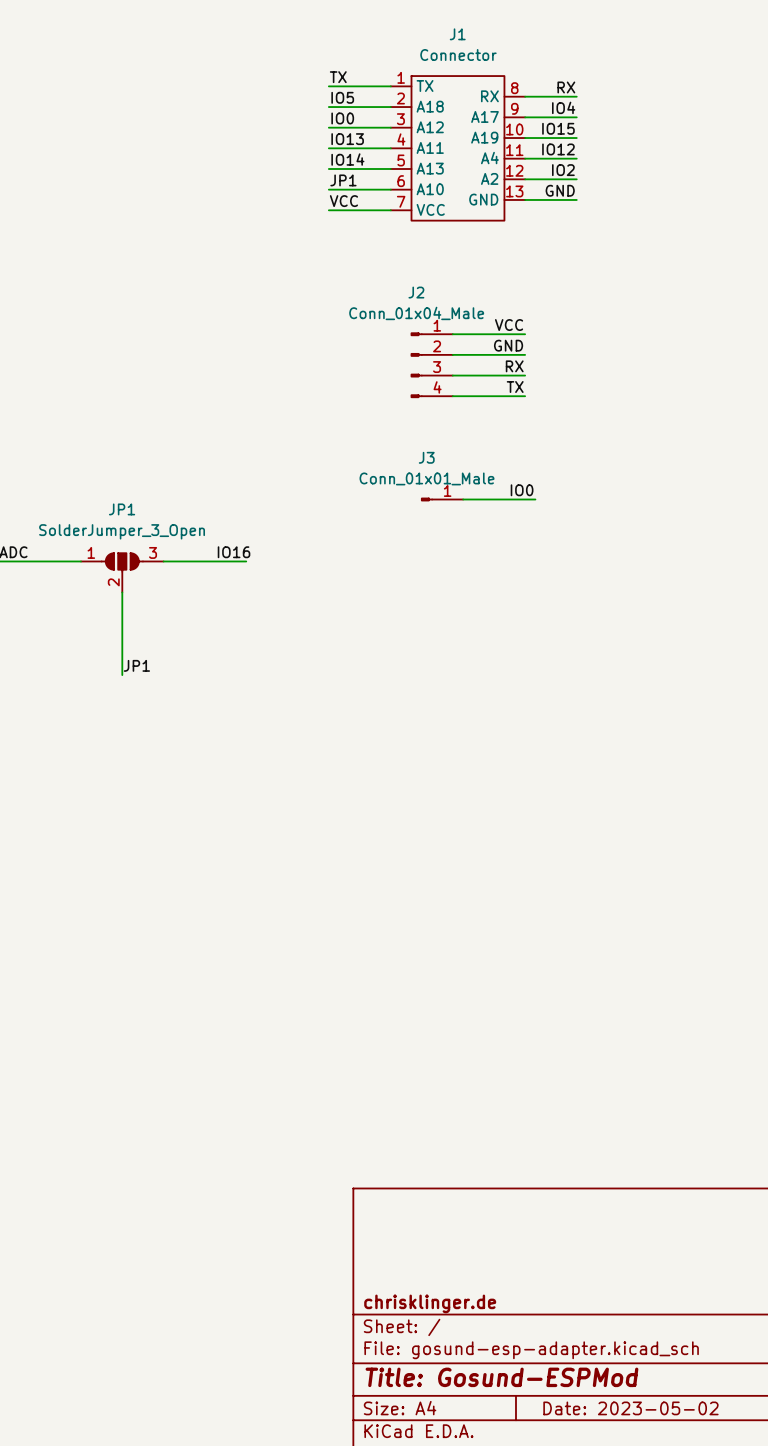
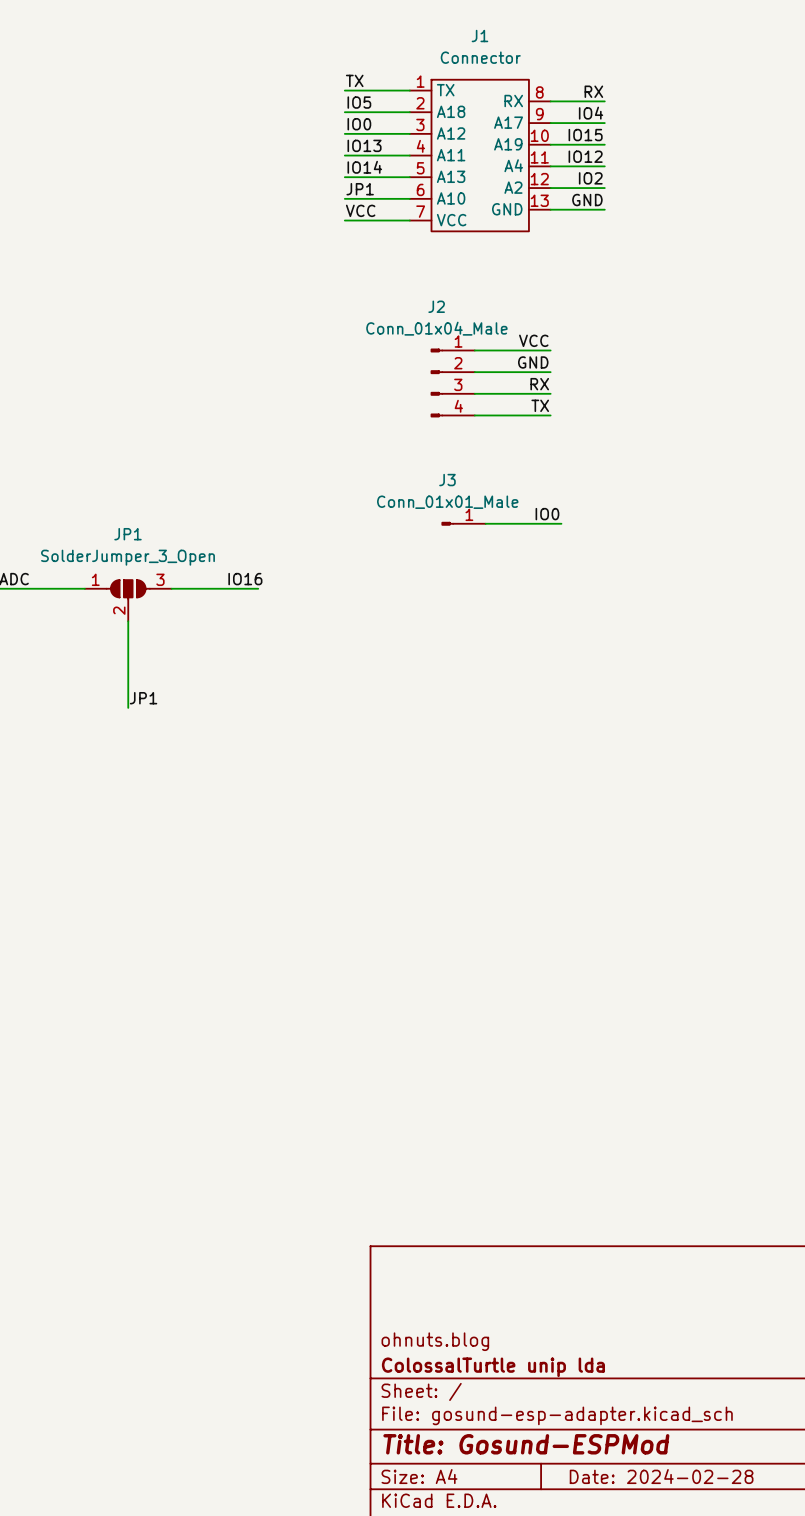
title block: none -> ohnuts.blog (435, 1341)
title block: chrisklinger.de (430, 1303) -> ColossalTurtle unip lda (493, 1367)
title block: Date: 2023-05-02 (630, 1408) -> Date: 2024-02-28 (661, 1476)

